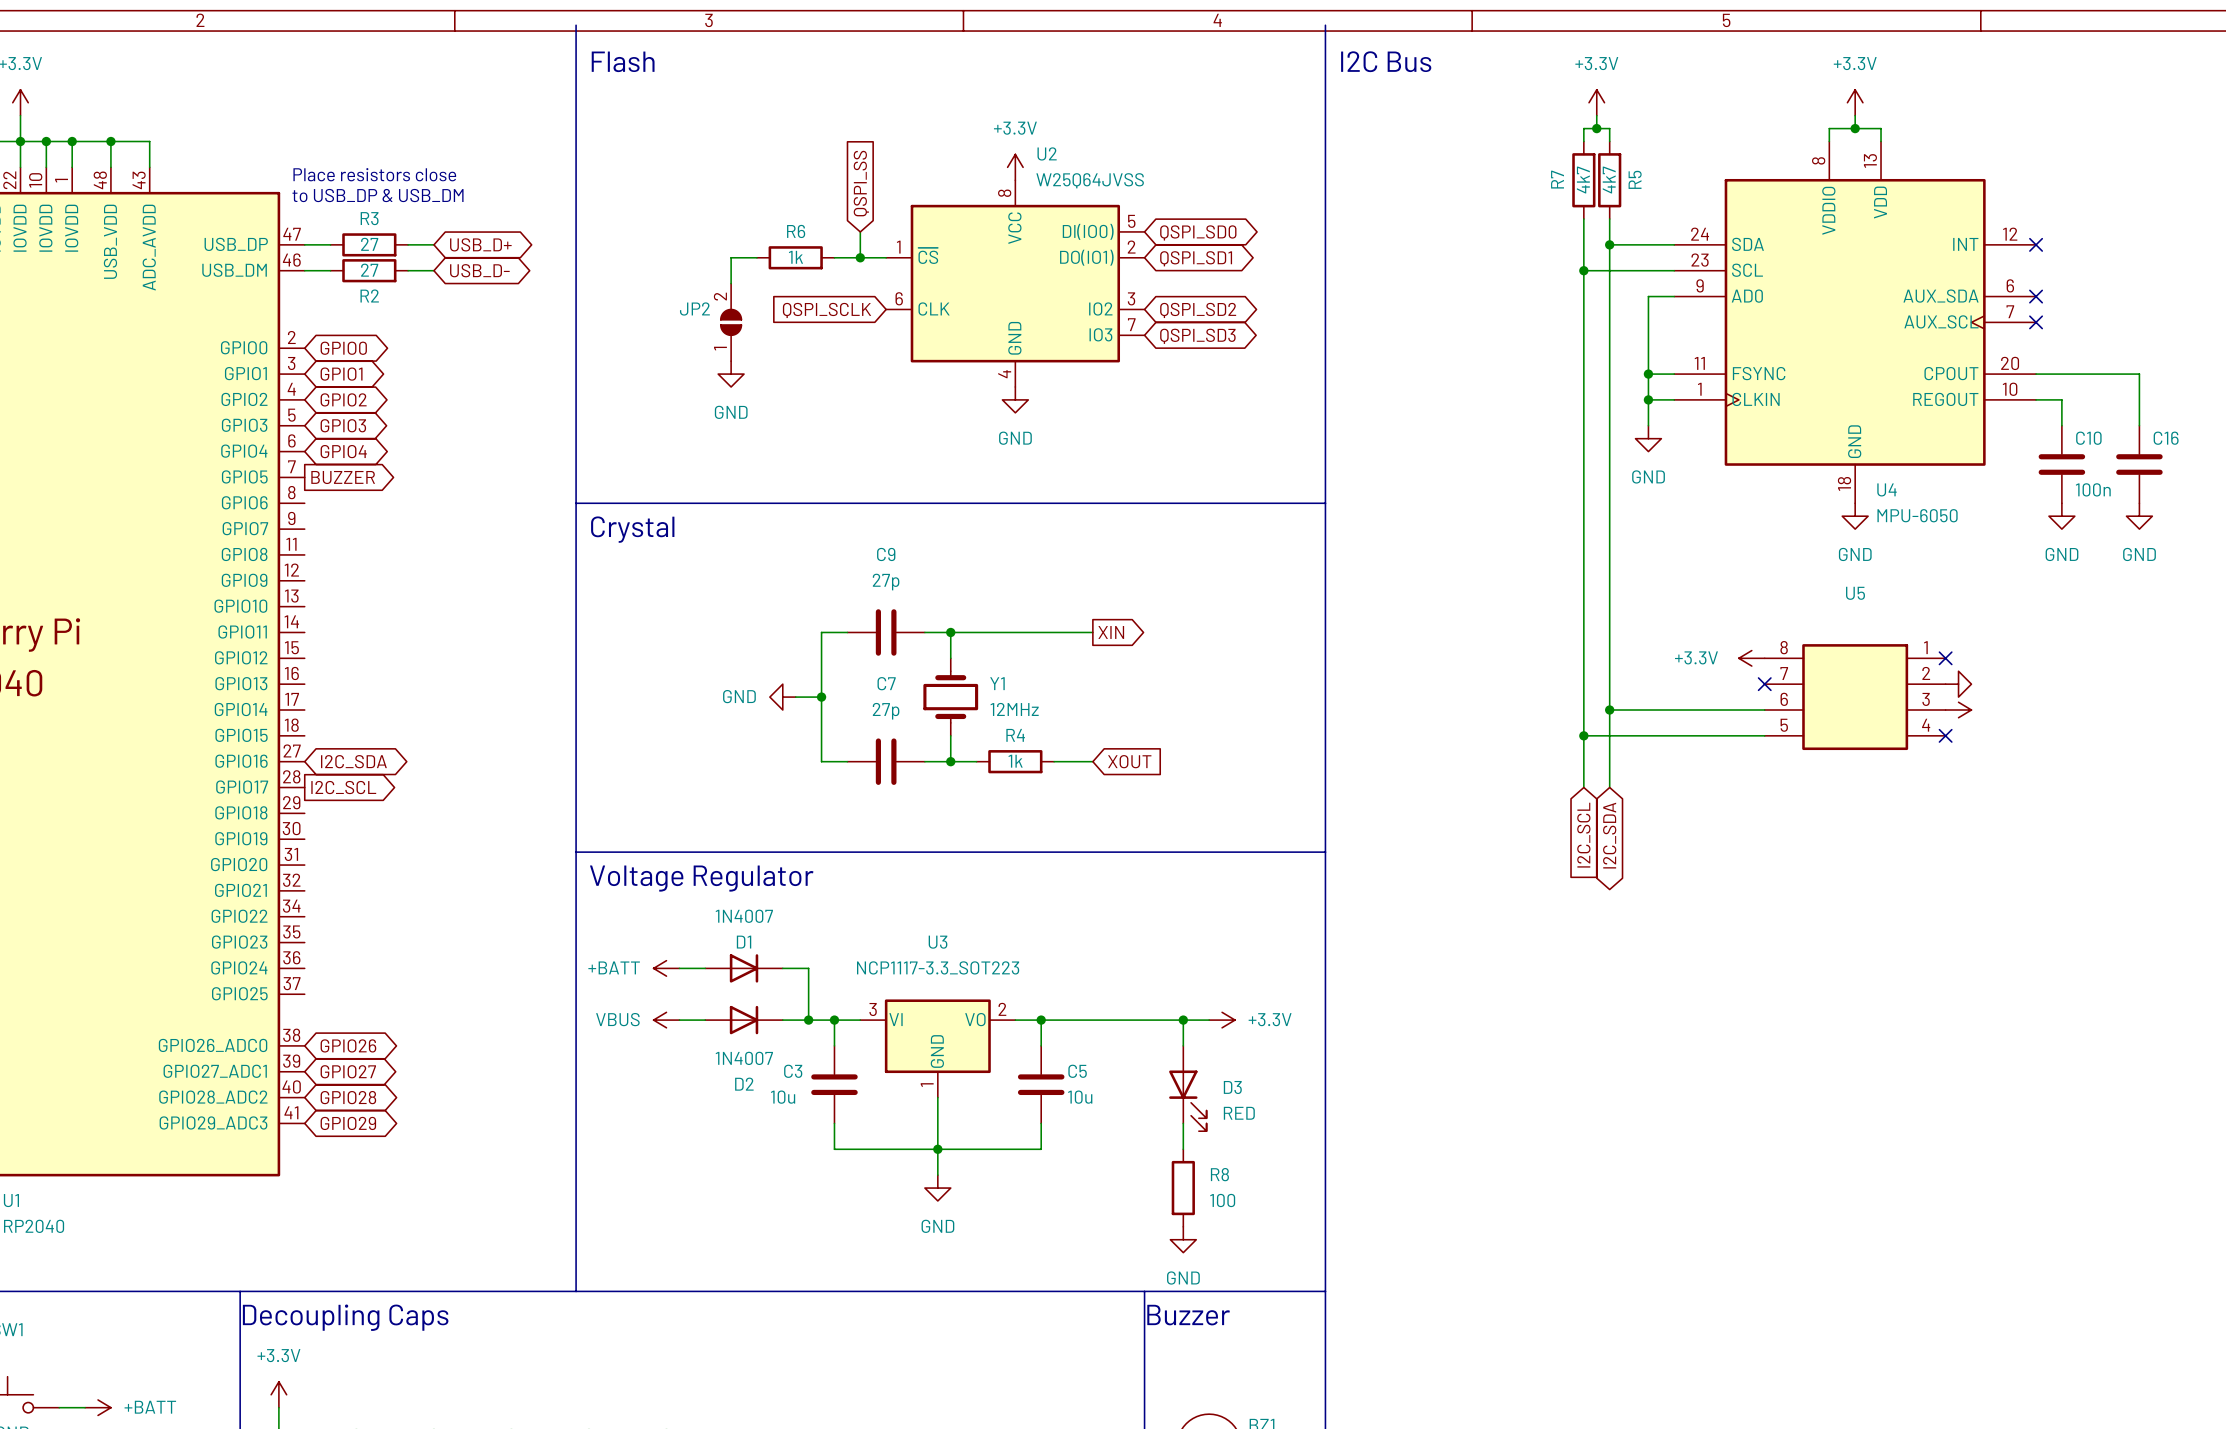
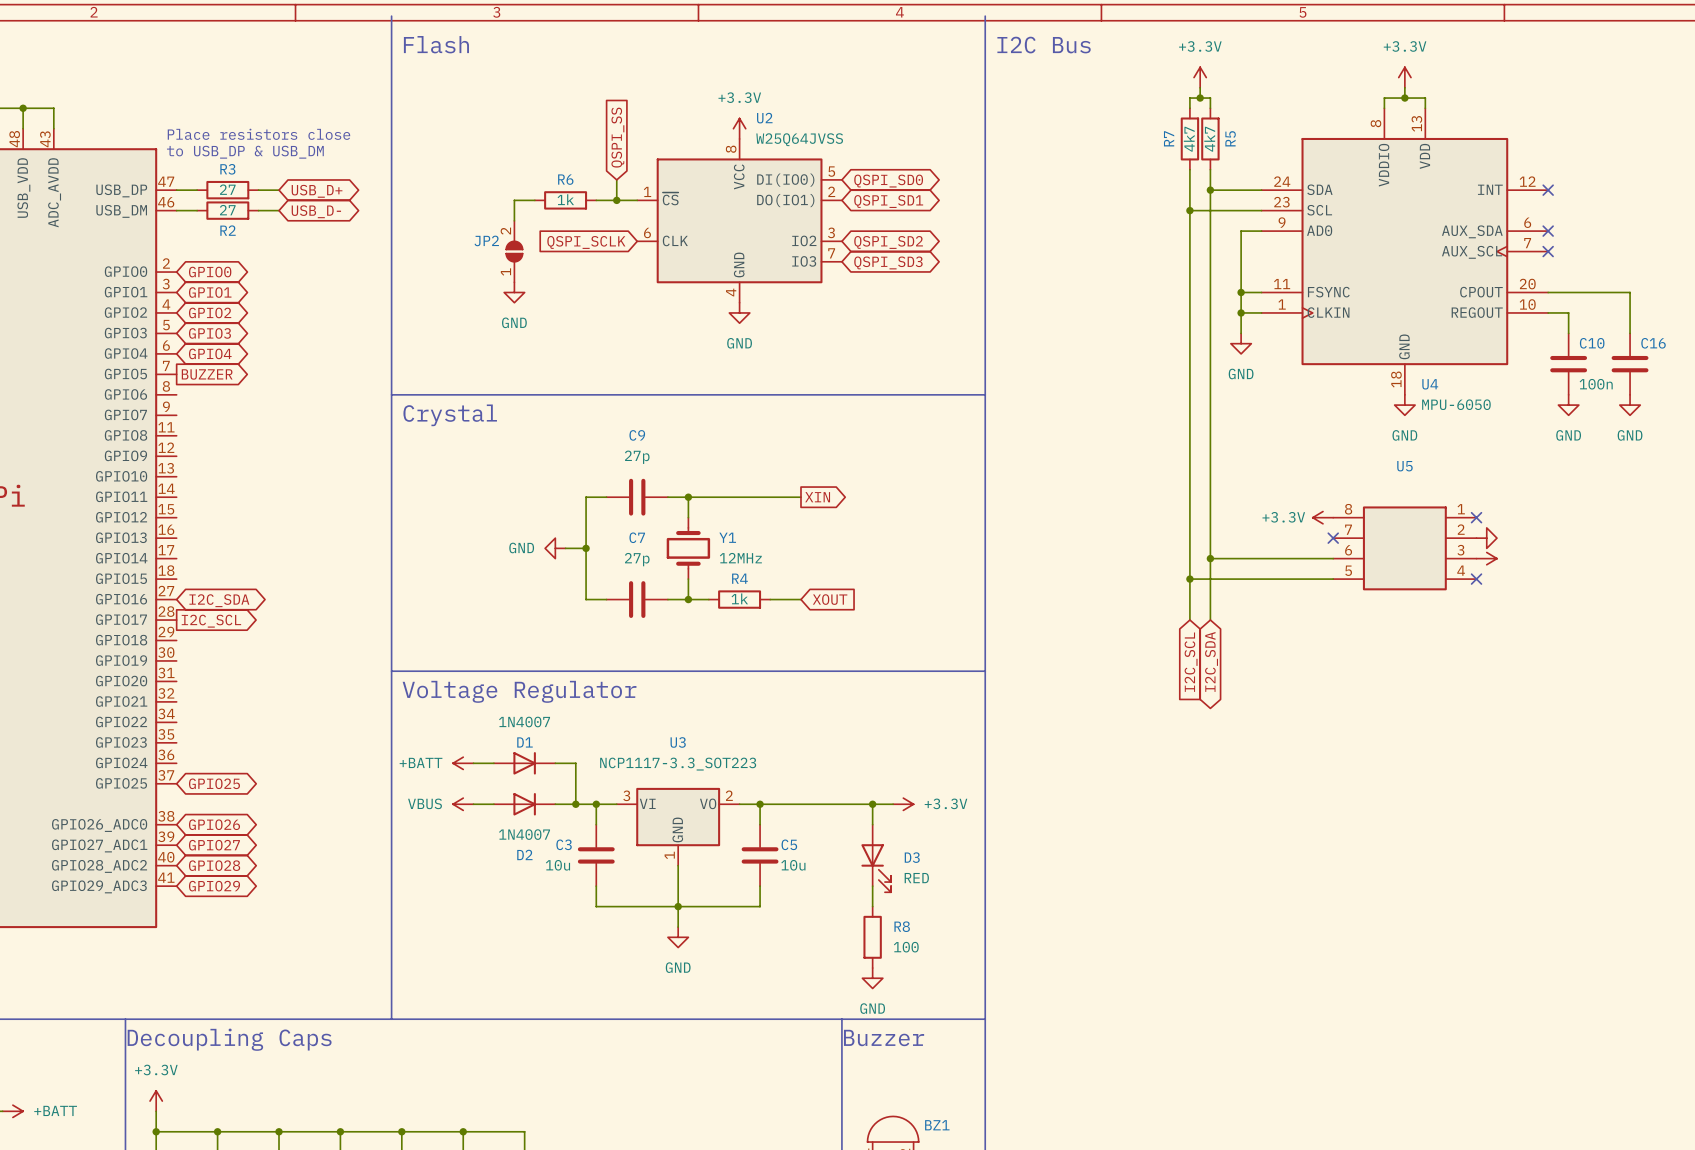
global label: none -> GPIO25 (214, 783)

